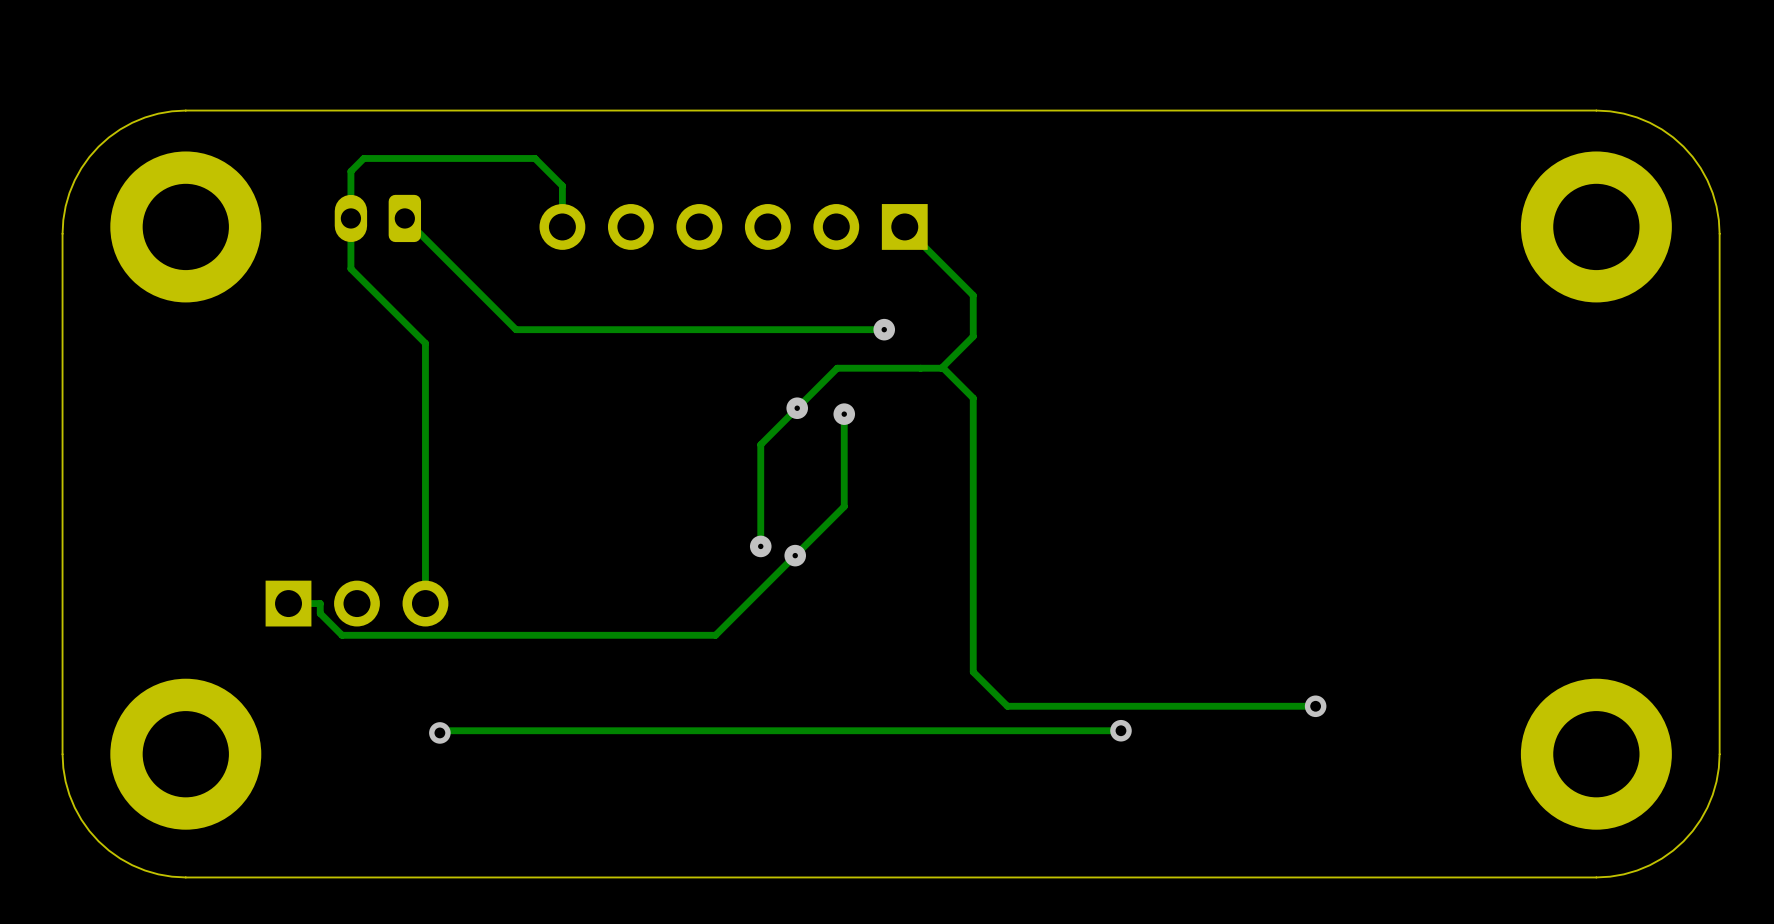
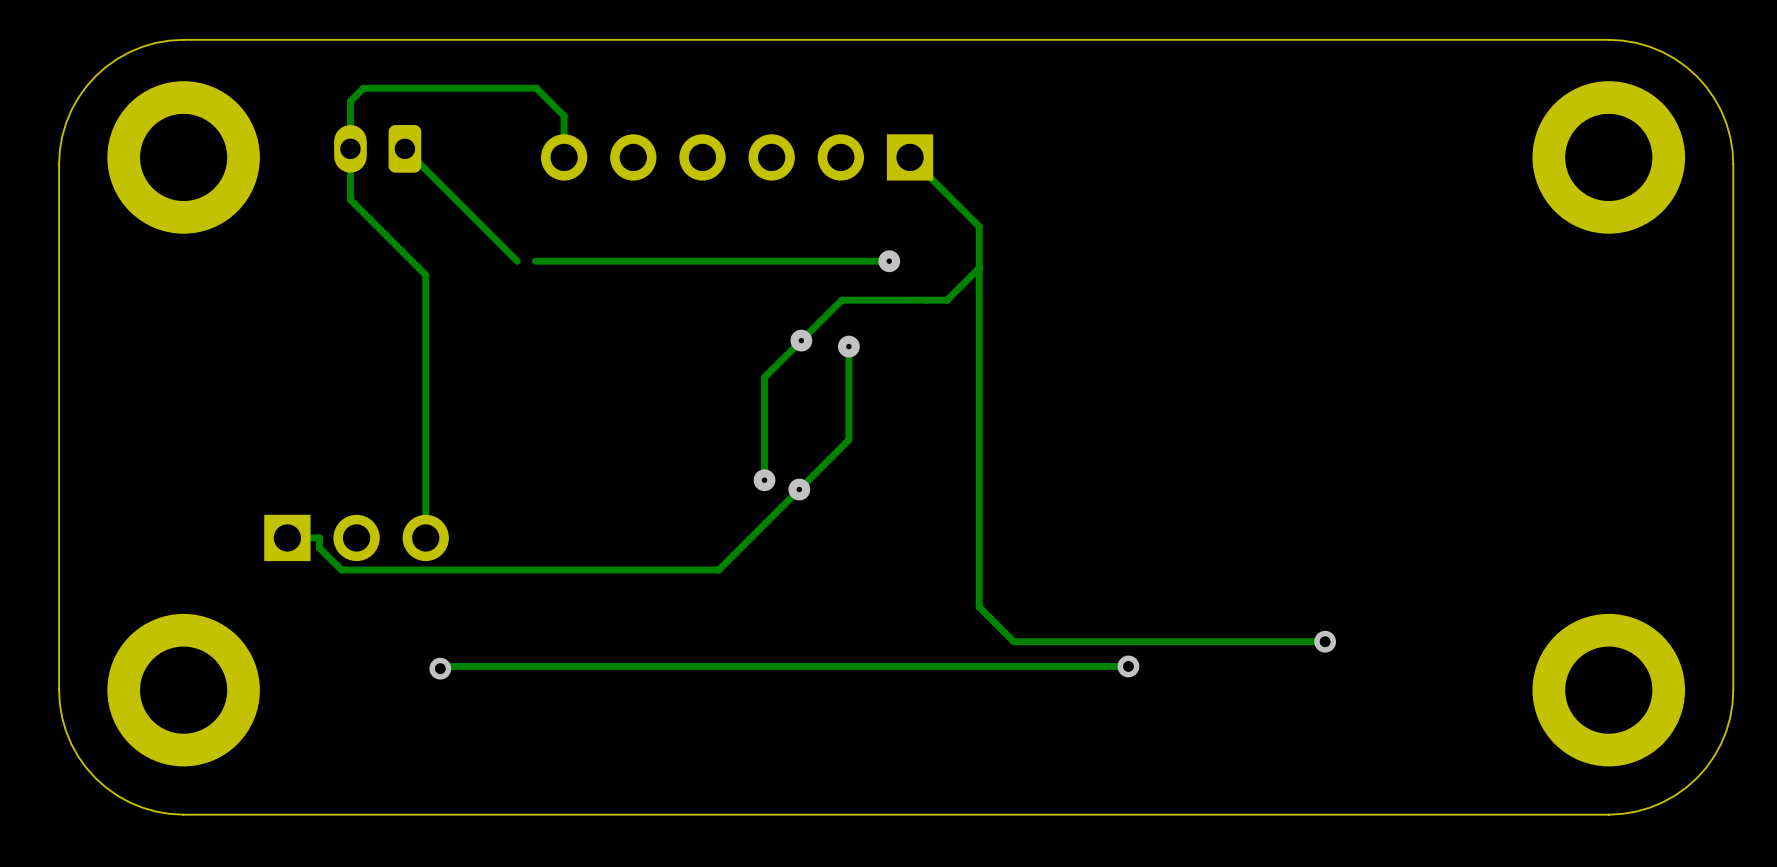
track: (533, 329) (516, 329) -> none
track: (941, 368) (973, 398) -> (979, 268) (979, 330)

